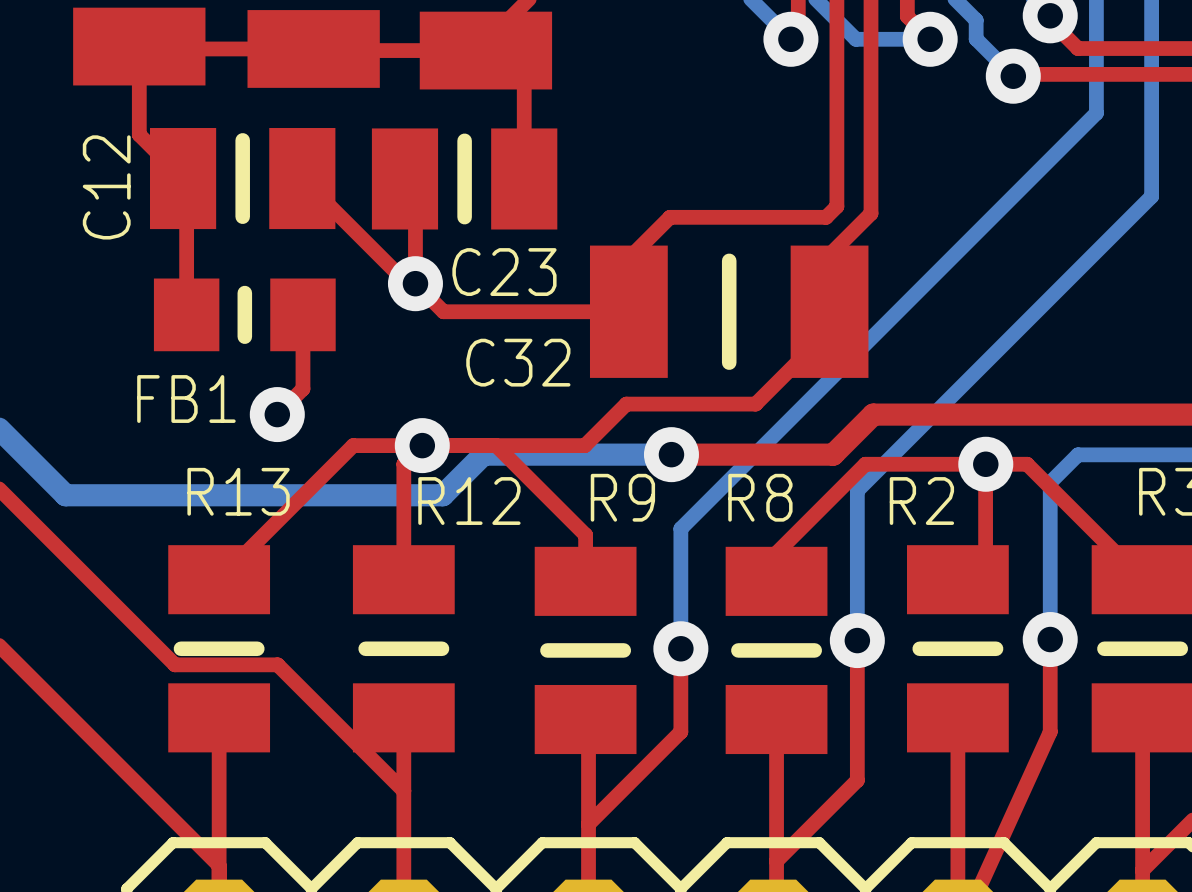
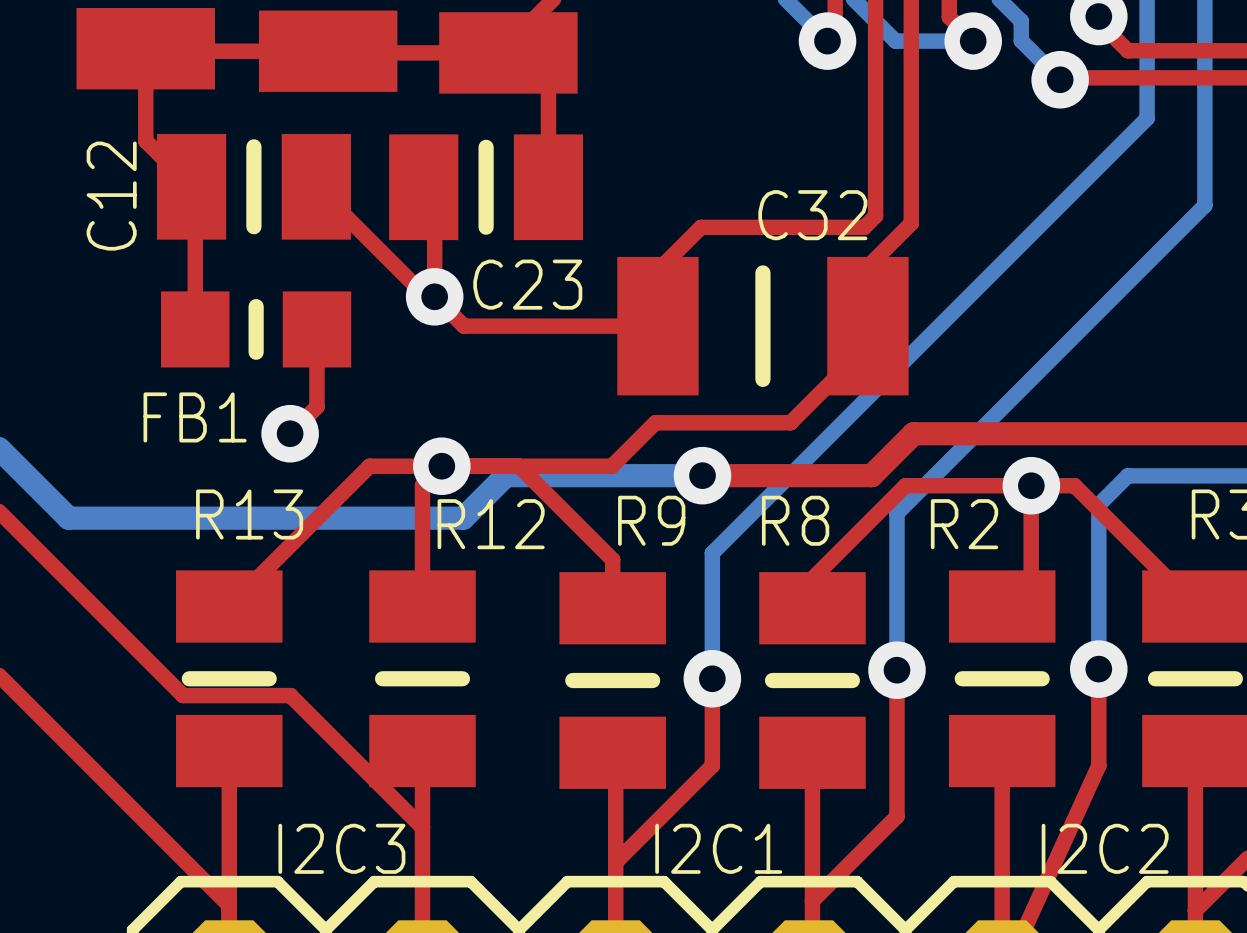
C32 name position: C32 (518, 362) -> C32 (812, 215)
text: none -> I2C3 (341, 848)
text: none -> I2C1 (718, 848)
text: none -> I2C2 (1105, 848)

